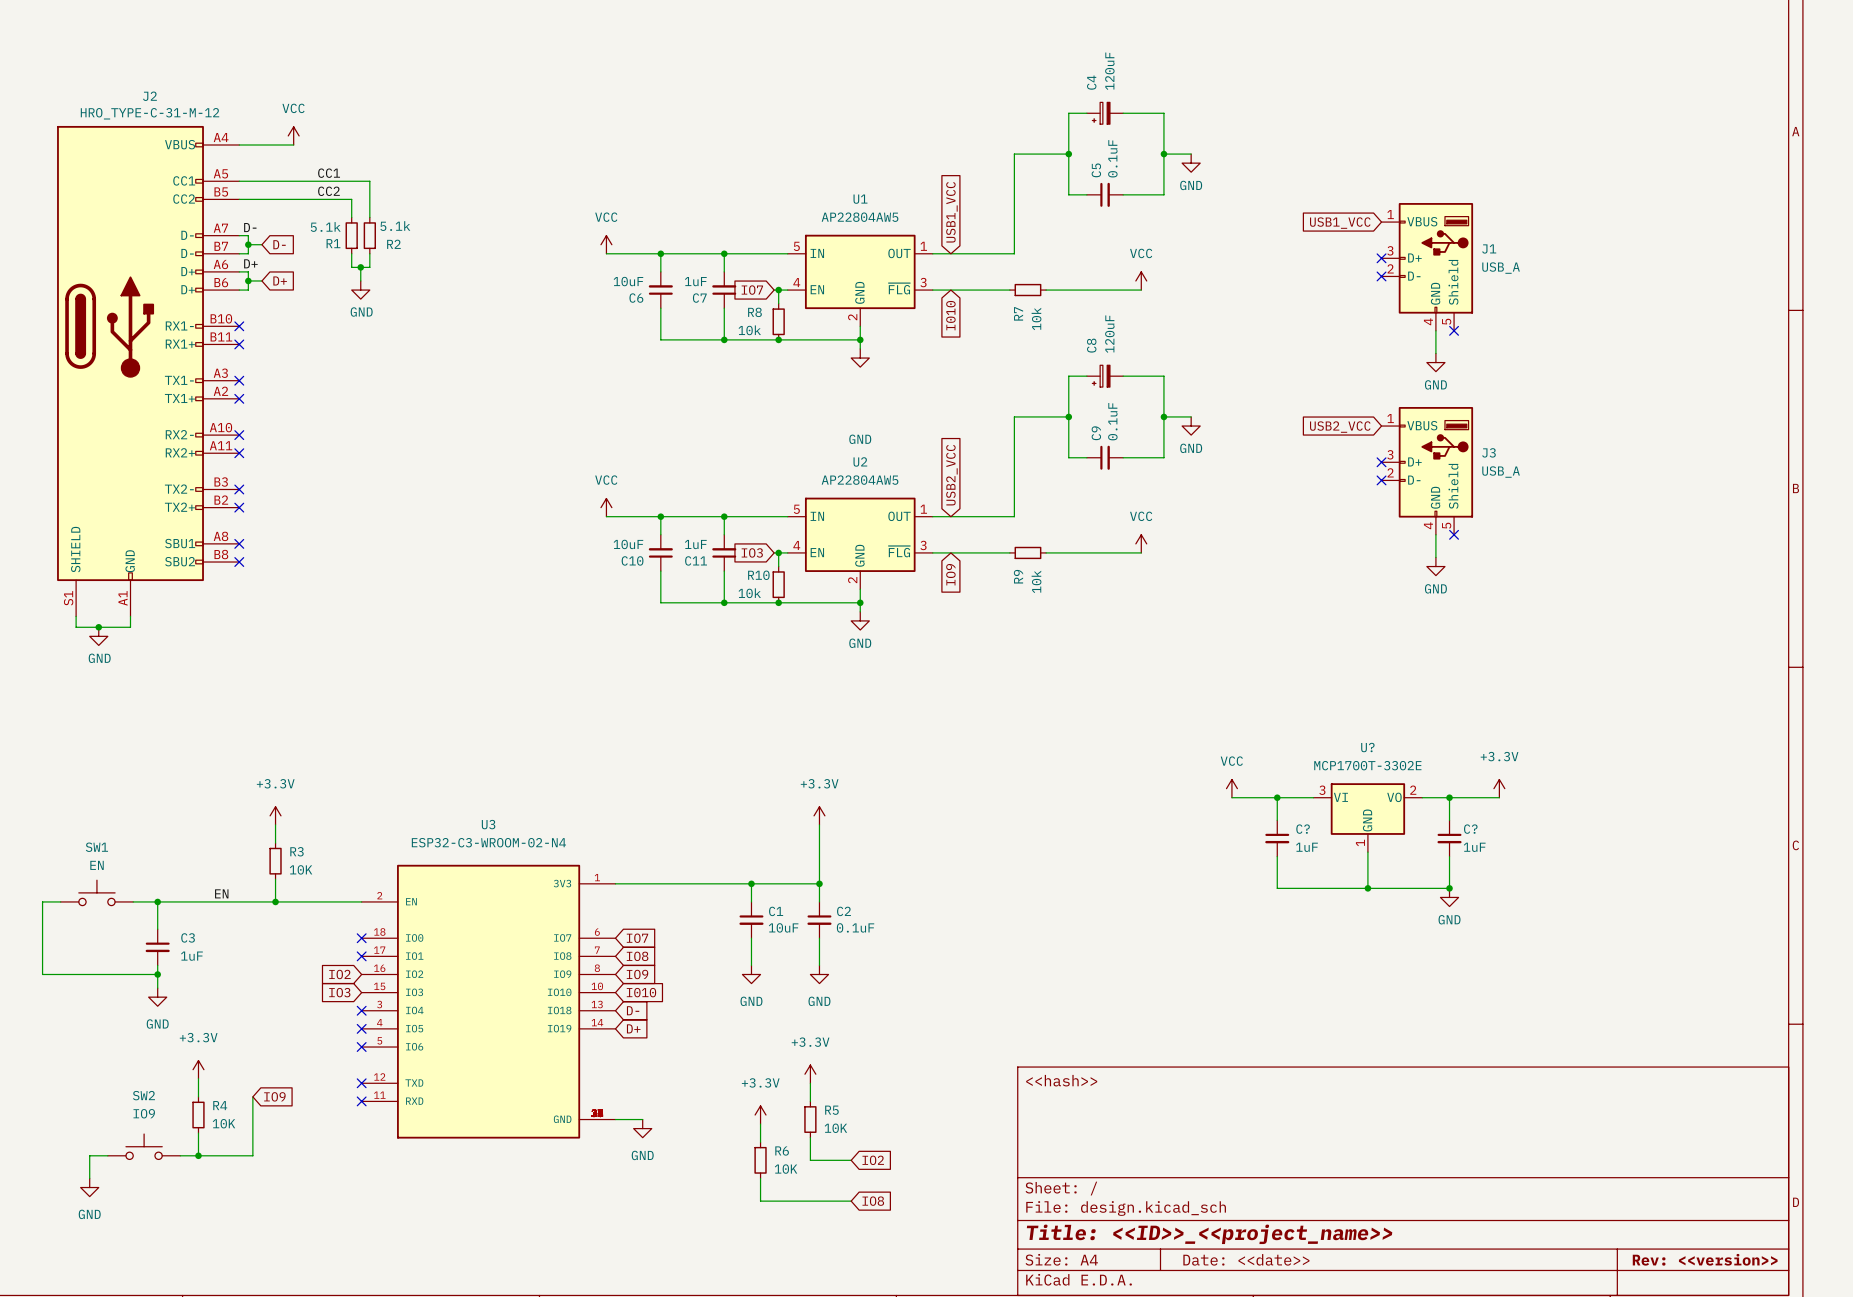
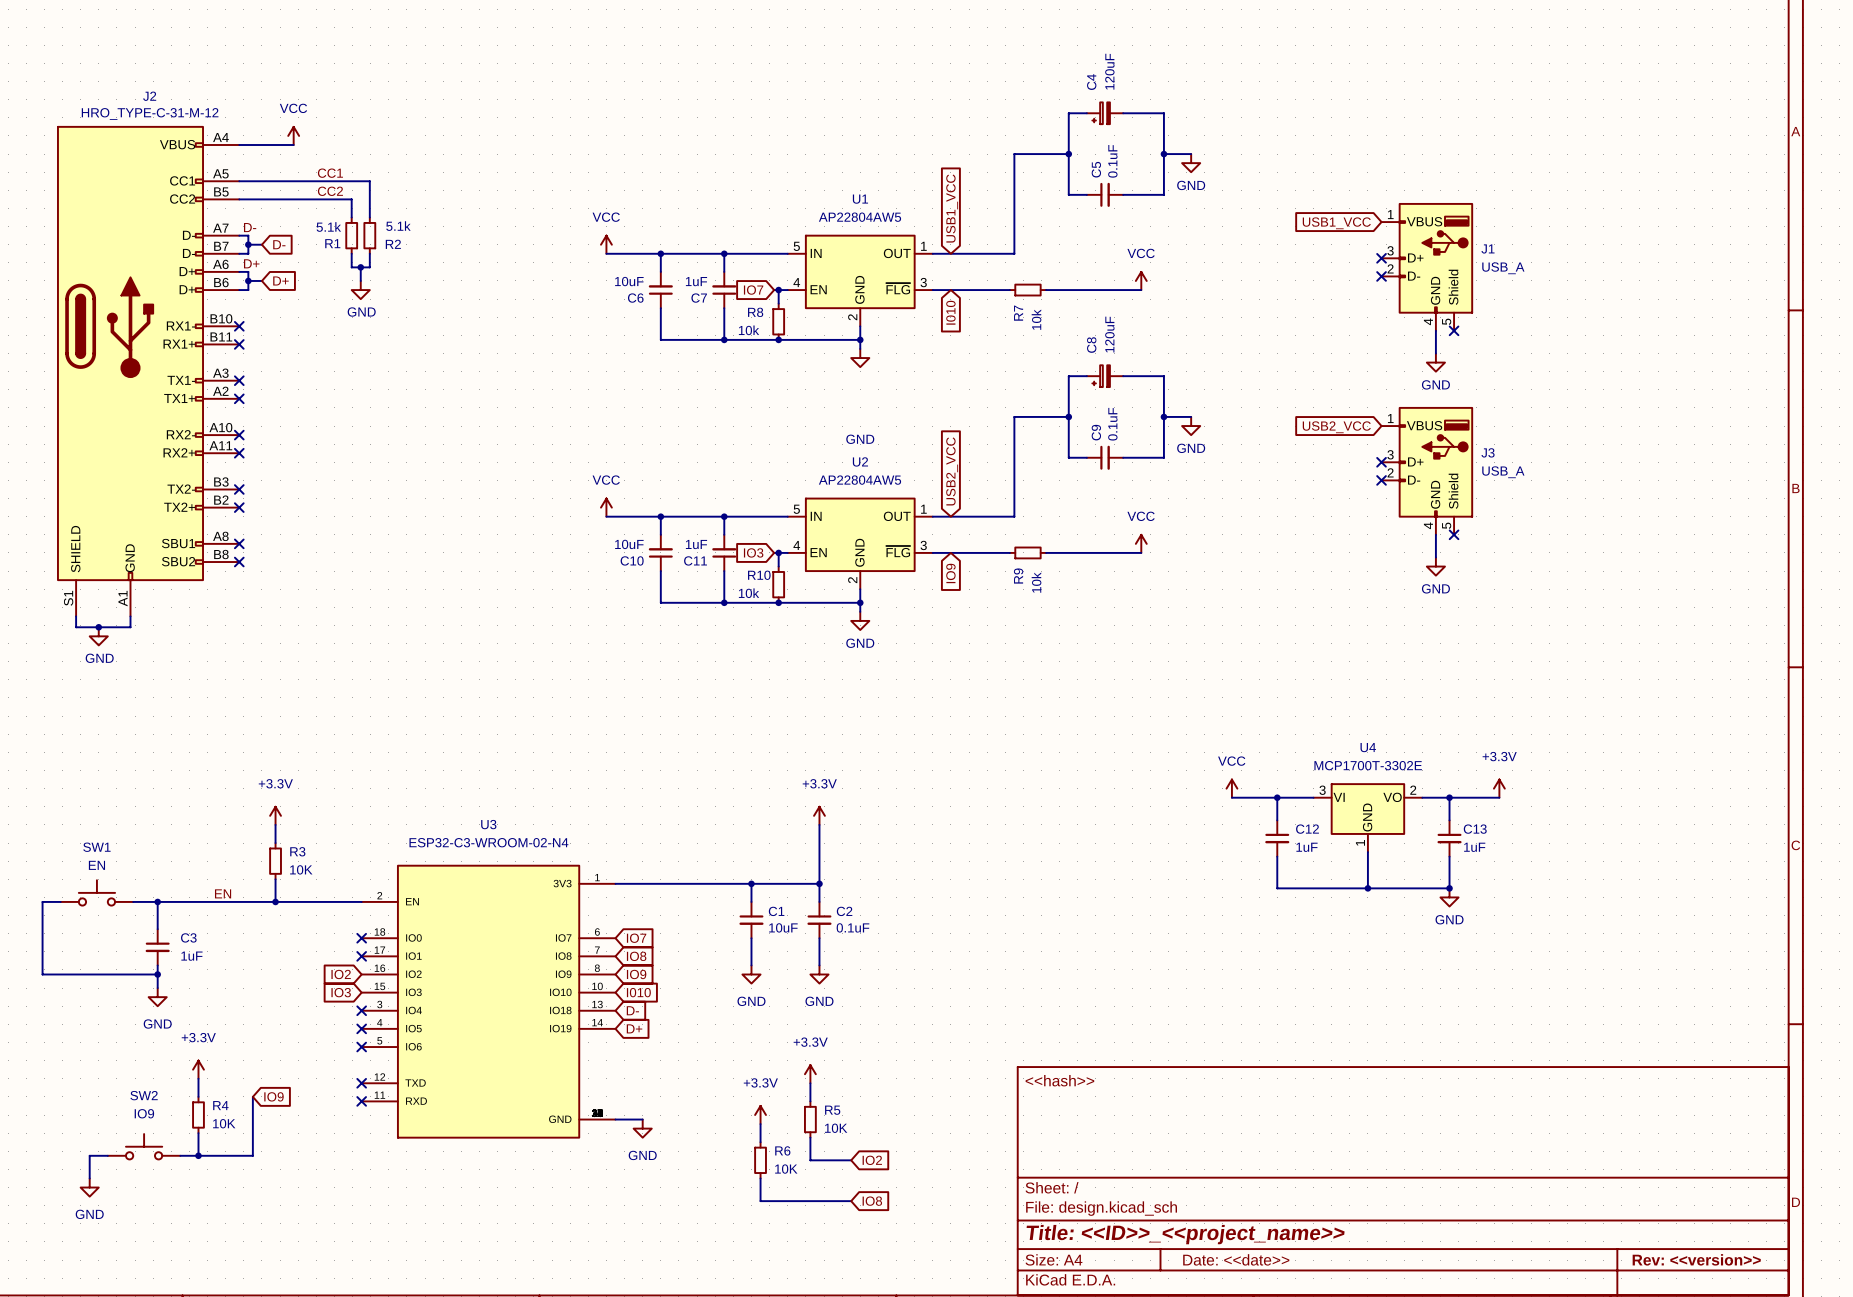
U? name: U? (1367, 747) -> U4 (1368, 747)
C? name: C? (1303, 829) -> C12 (1307, 829)
C? name: C? (1470, 829) -> C13 (1475, 829)

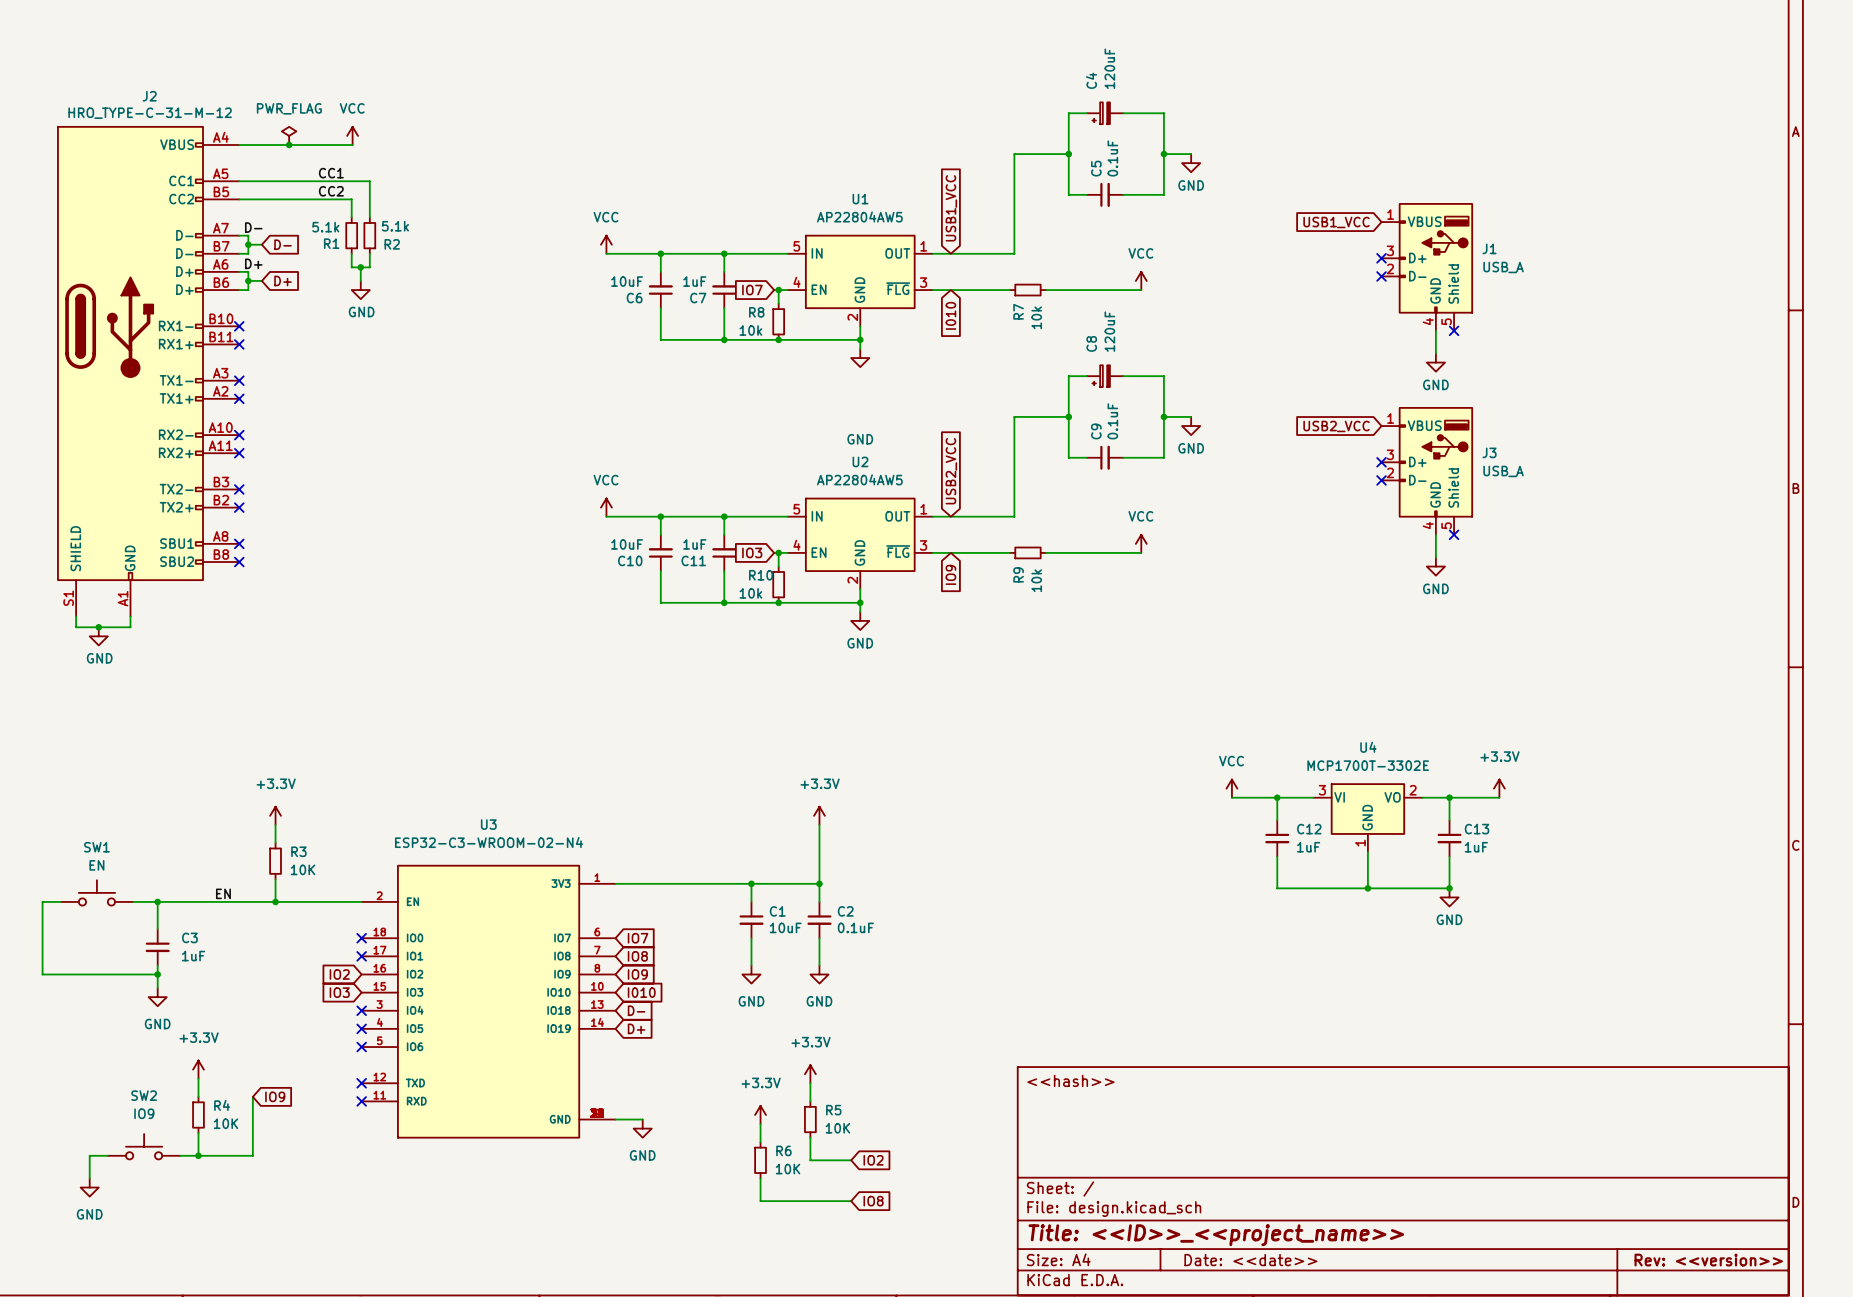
power symbol: VCC (293, 135) -> PWR_FLAG (289, 135)
power symbol: none -> VCC (352, 135)
junction: none -> (289, 145)
wire: none -> (293, 145) (352, 145)

